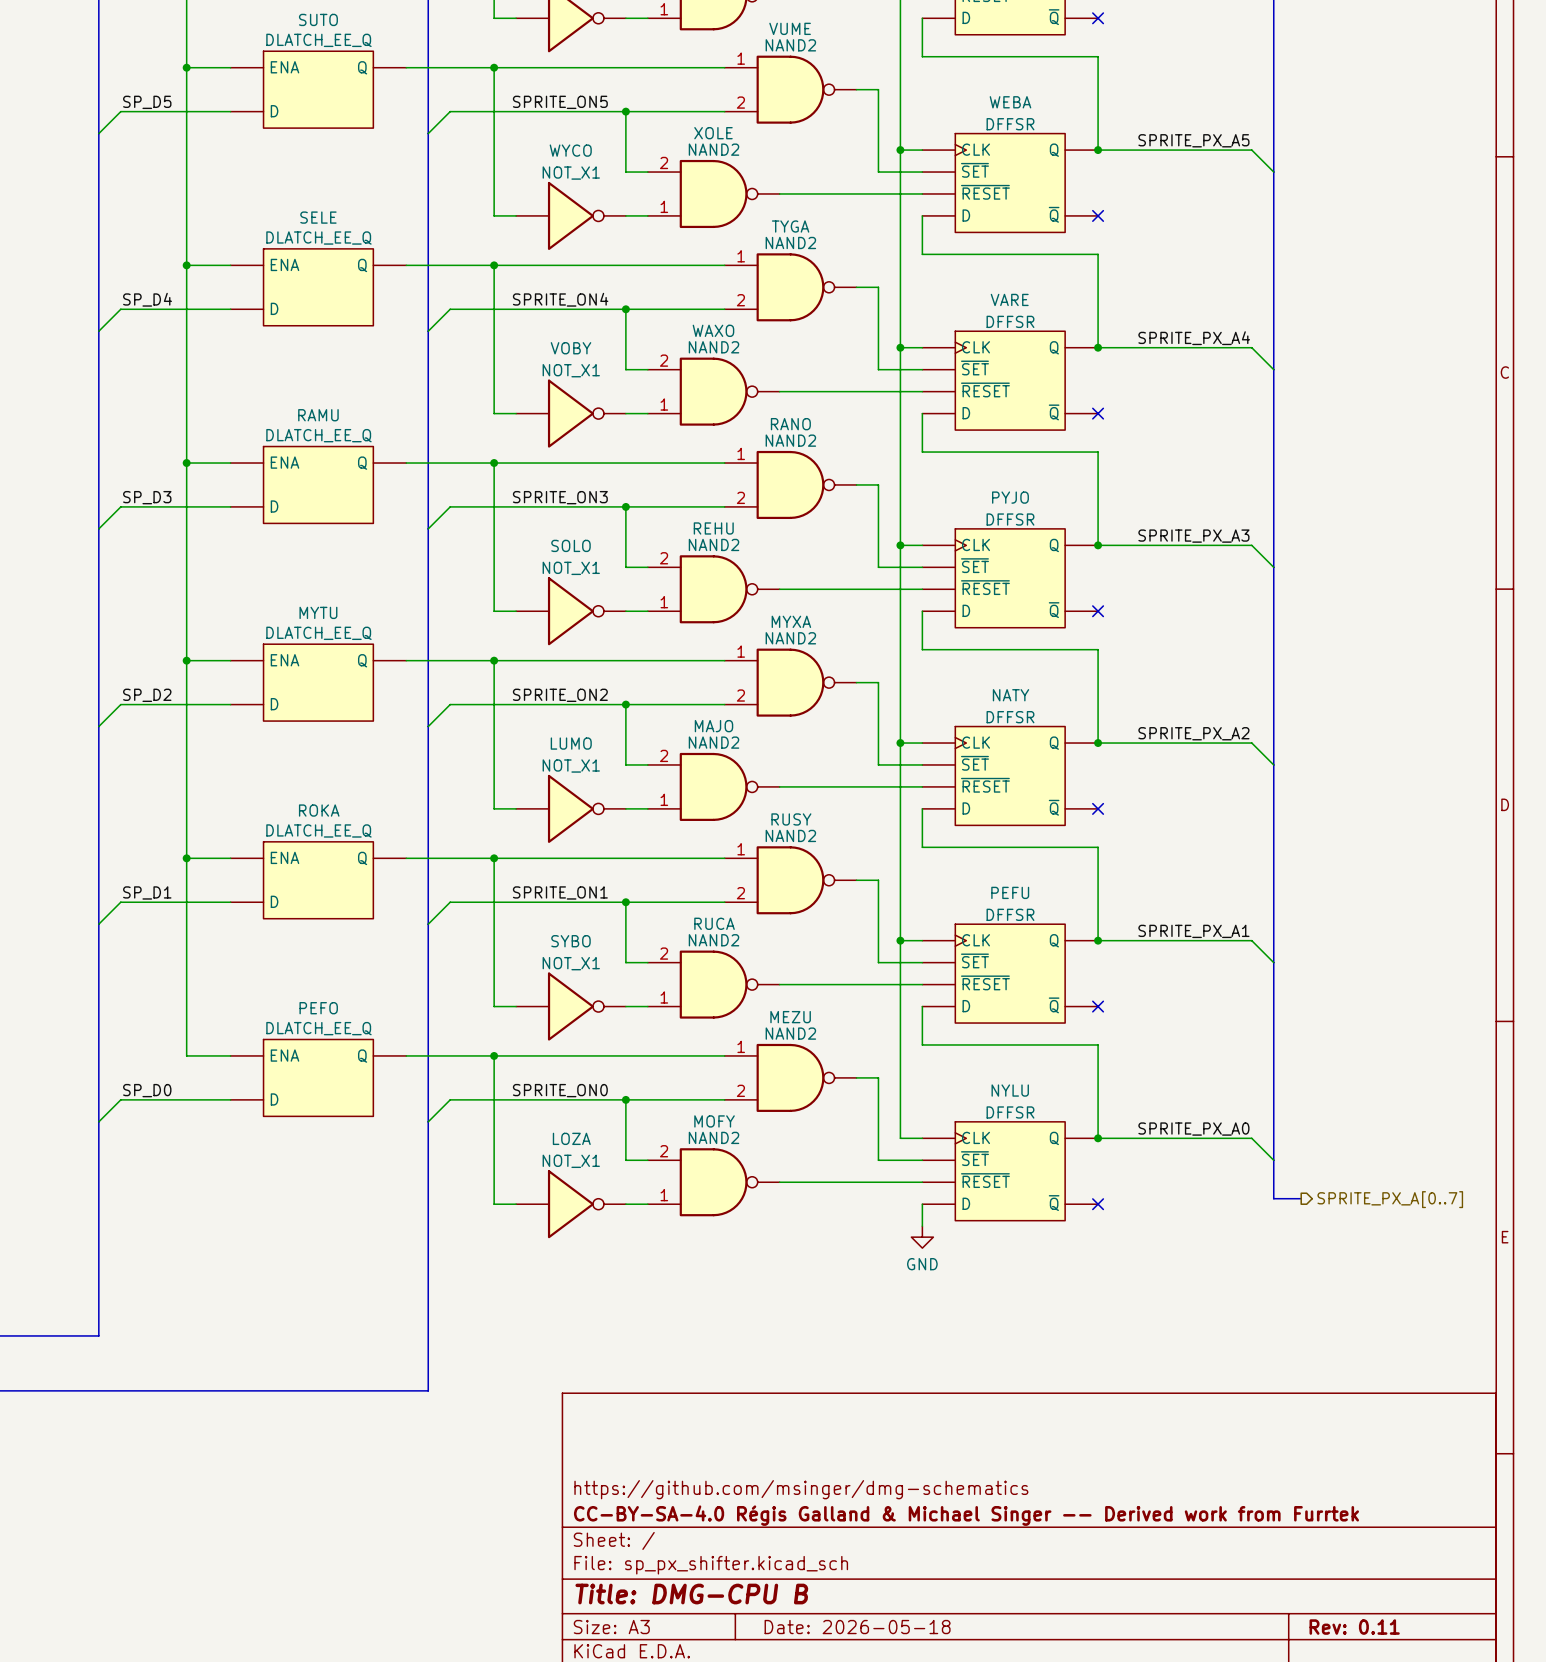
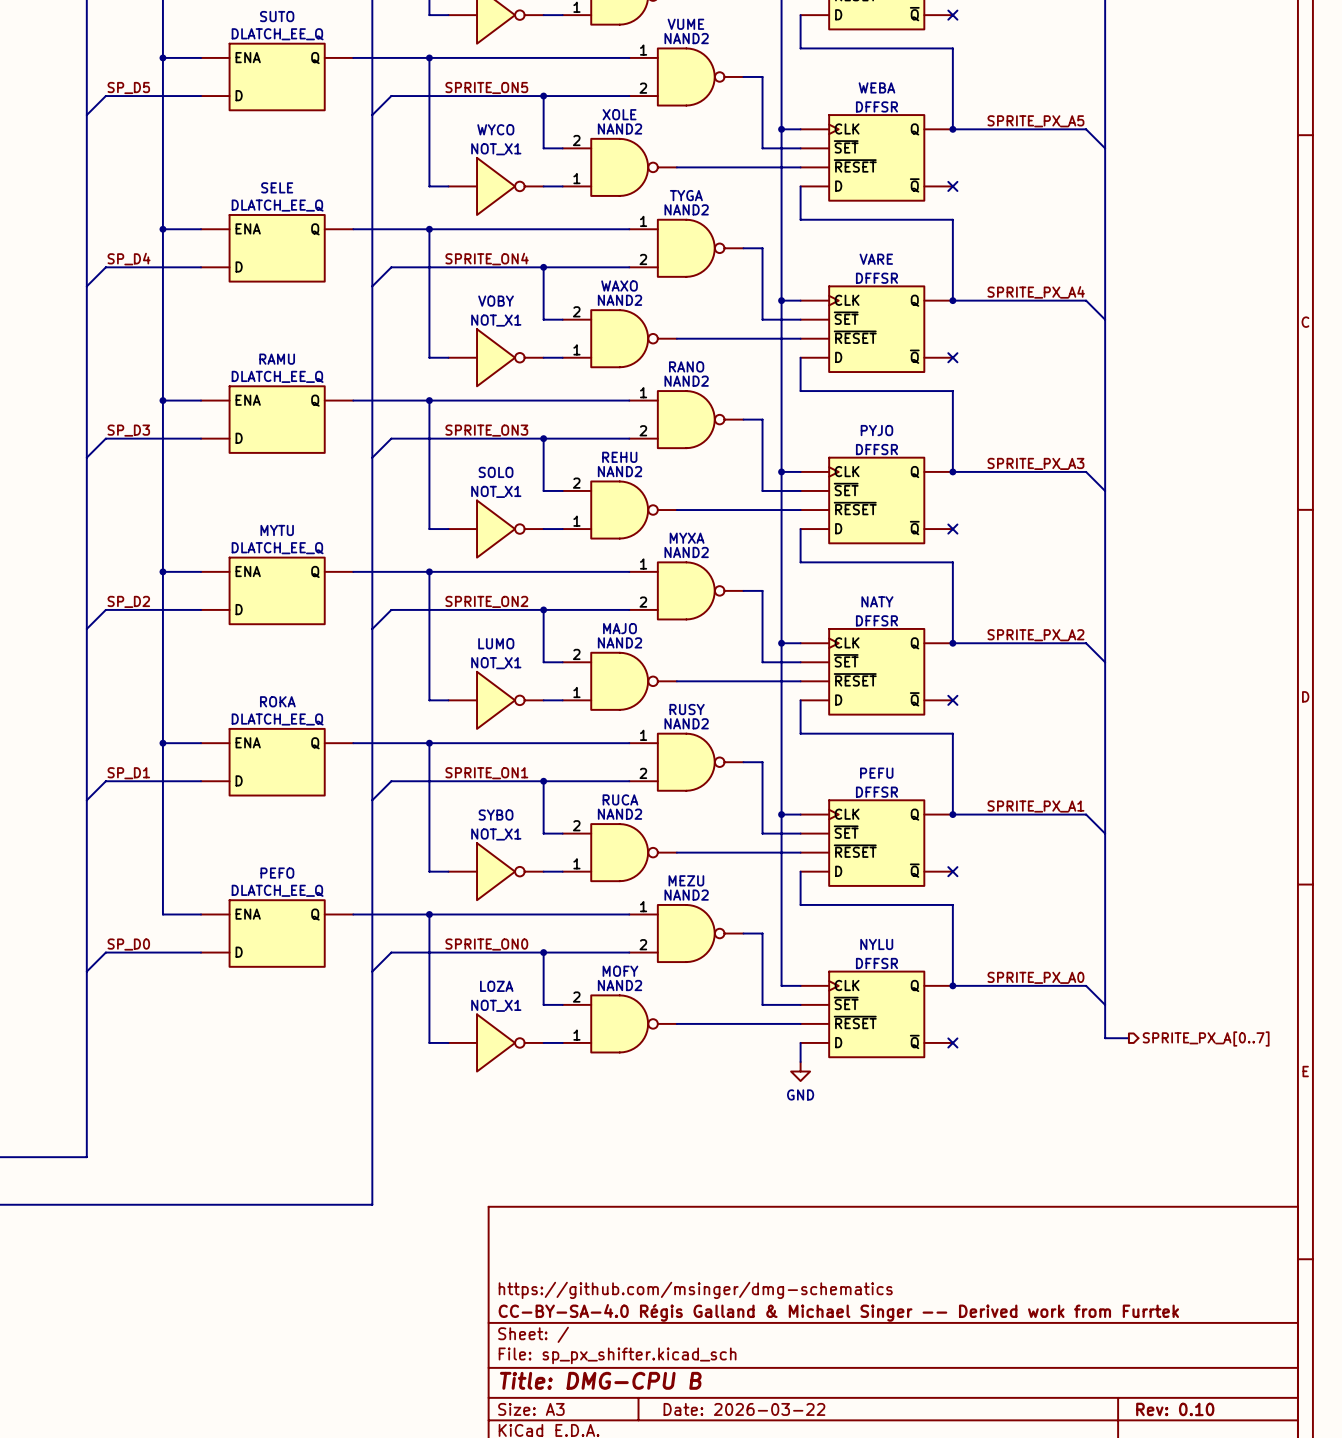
title block: Date: 2026-05-18 (857, 1627) -> Date: 2026-03-22 (744, 1409)
title block: Rev: 0.11 (1354, 1627) -> Rev: 0.10 (1175, 1409)

